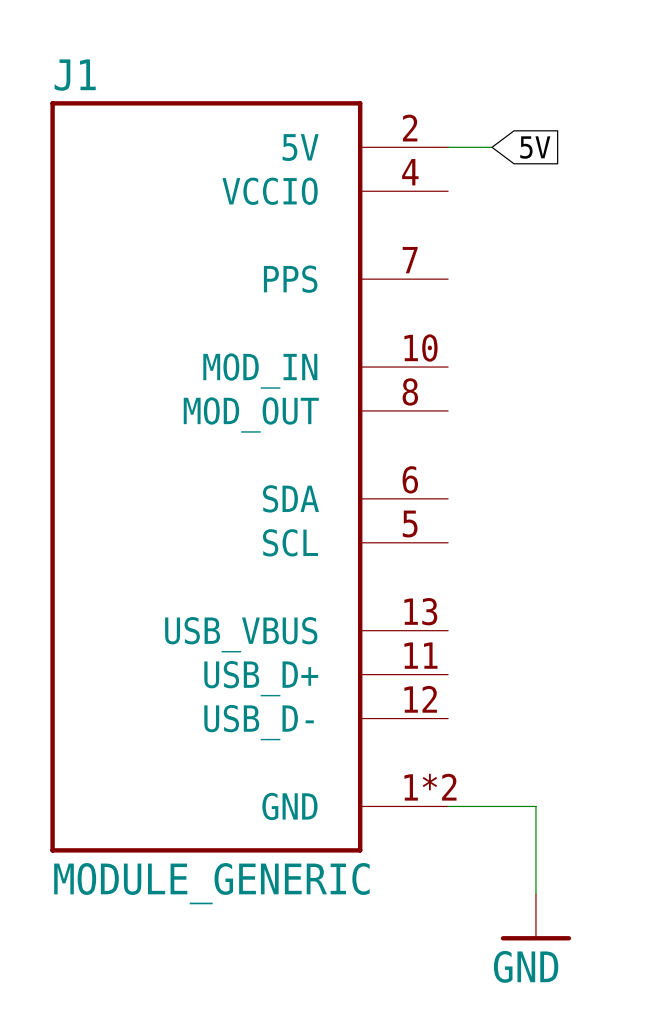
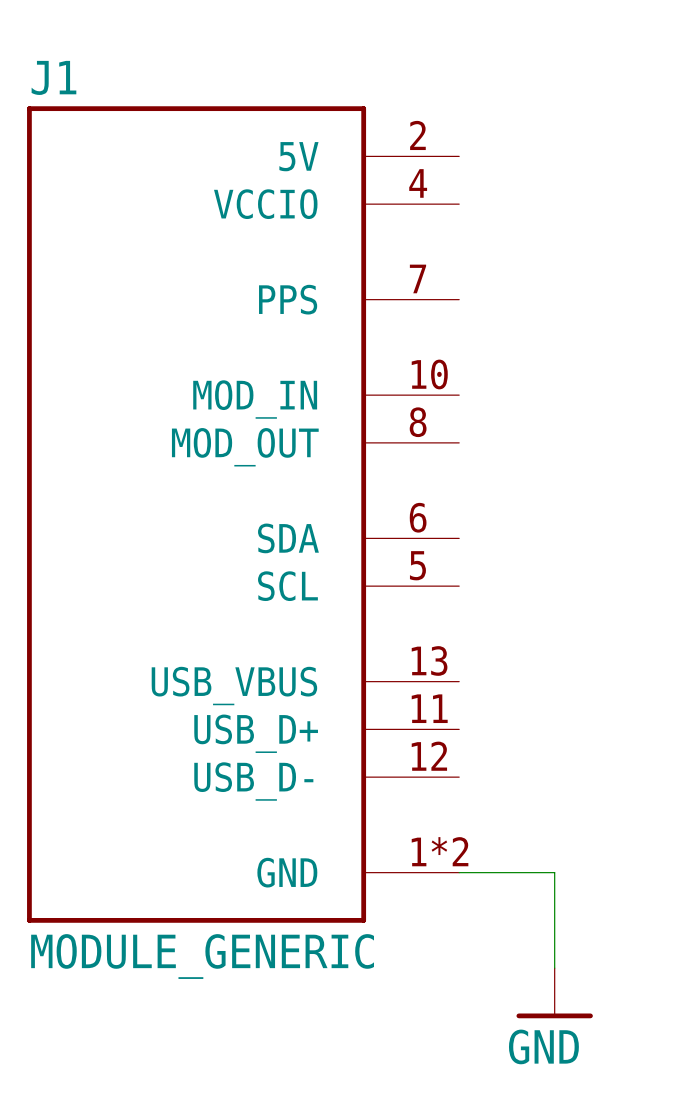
wire: (448, 147) (492, 147) -> none
global label: 5V (535, 147) -> none

